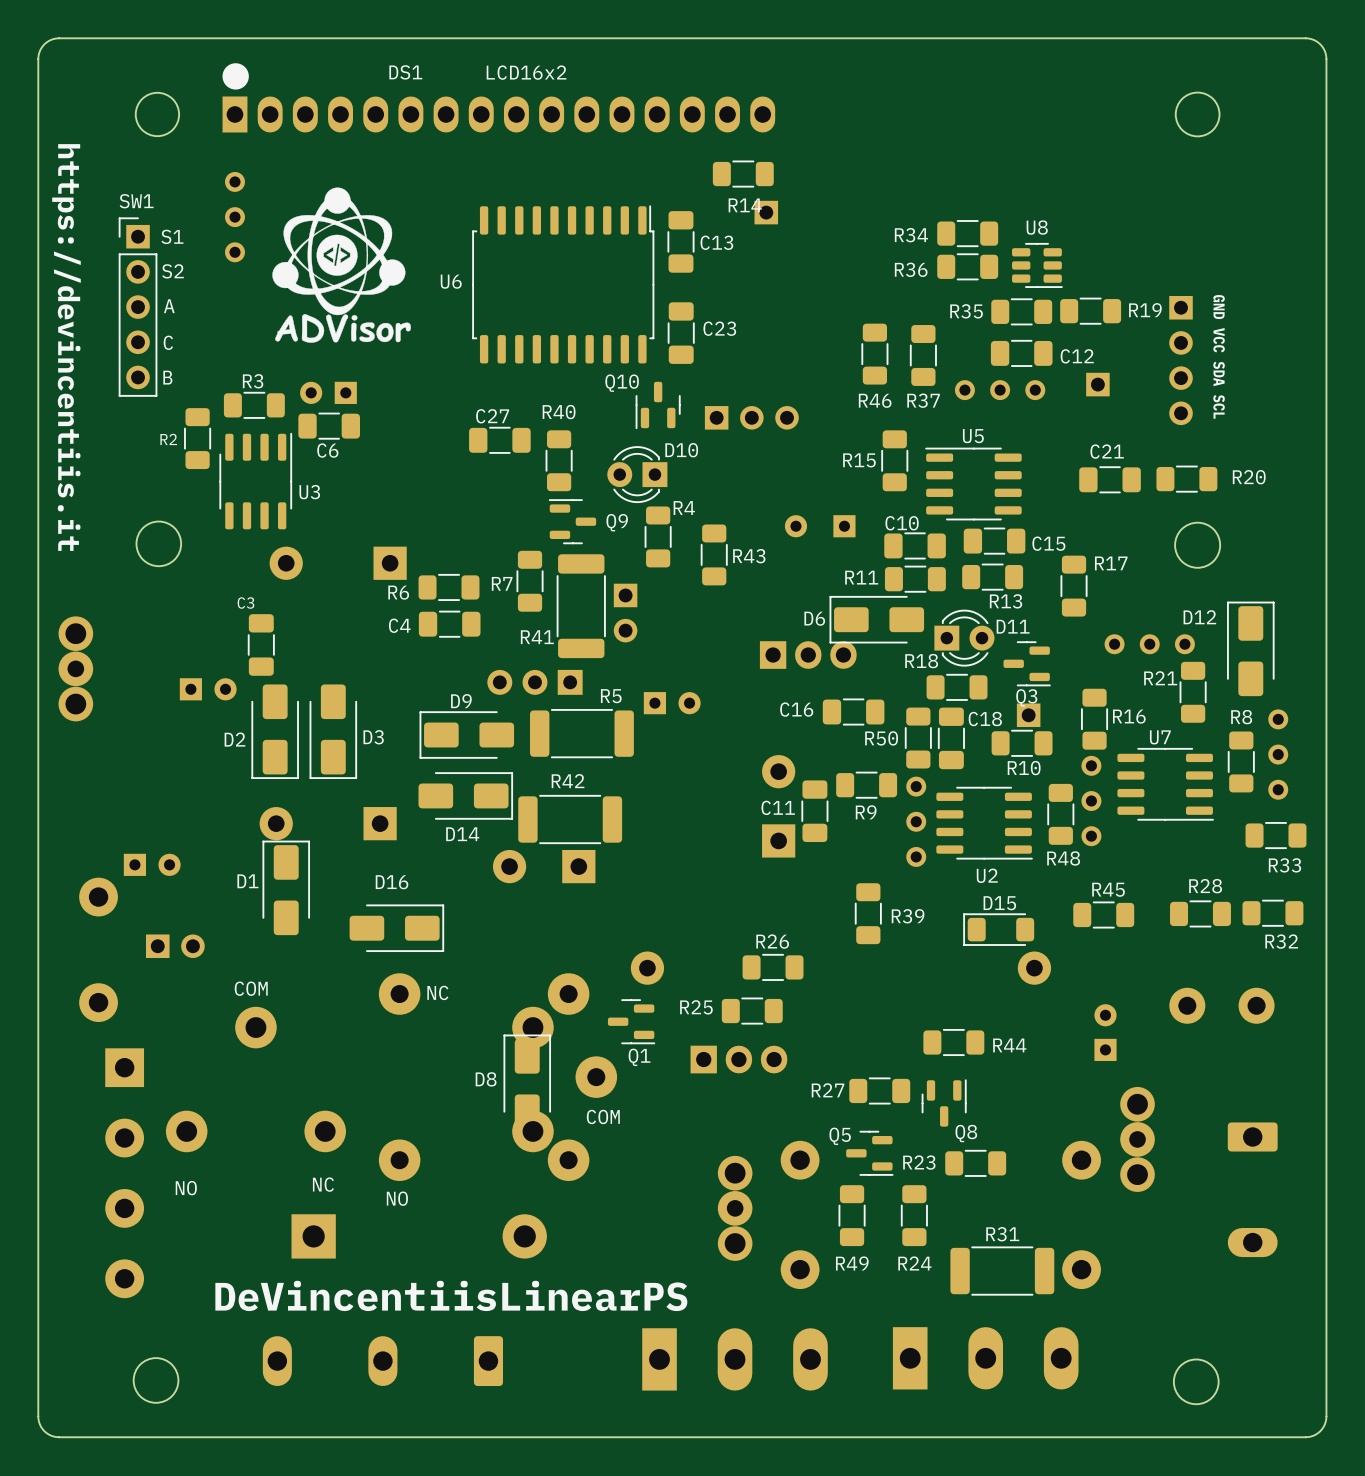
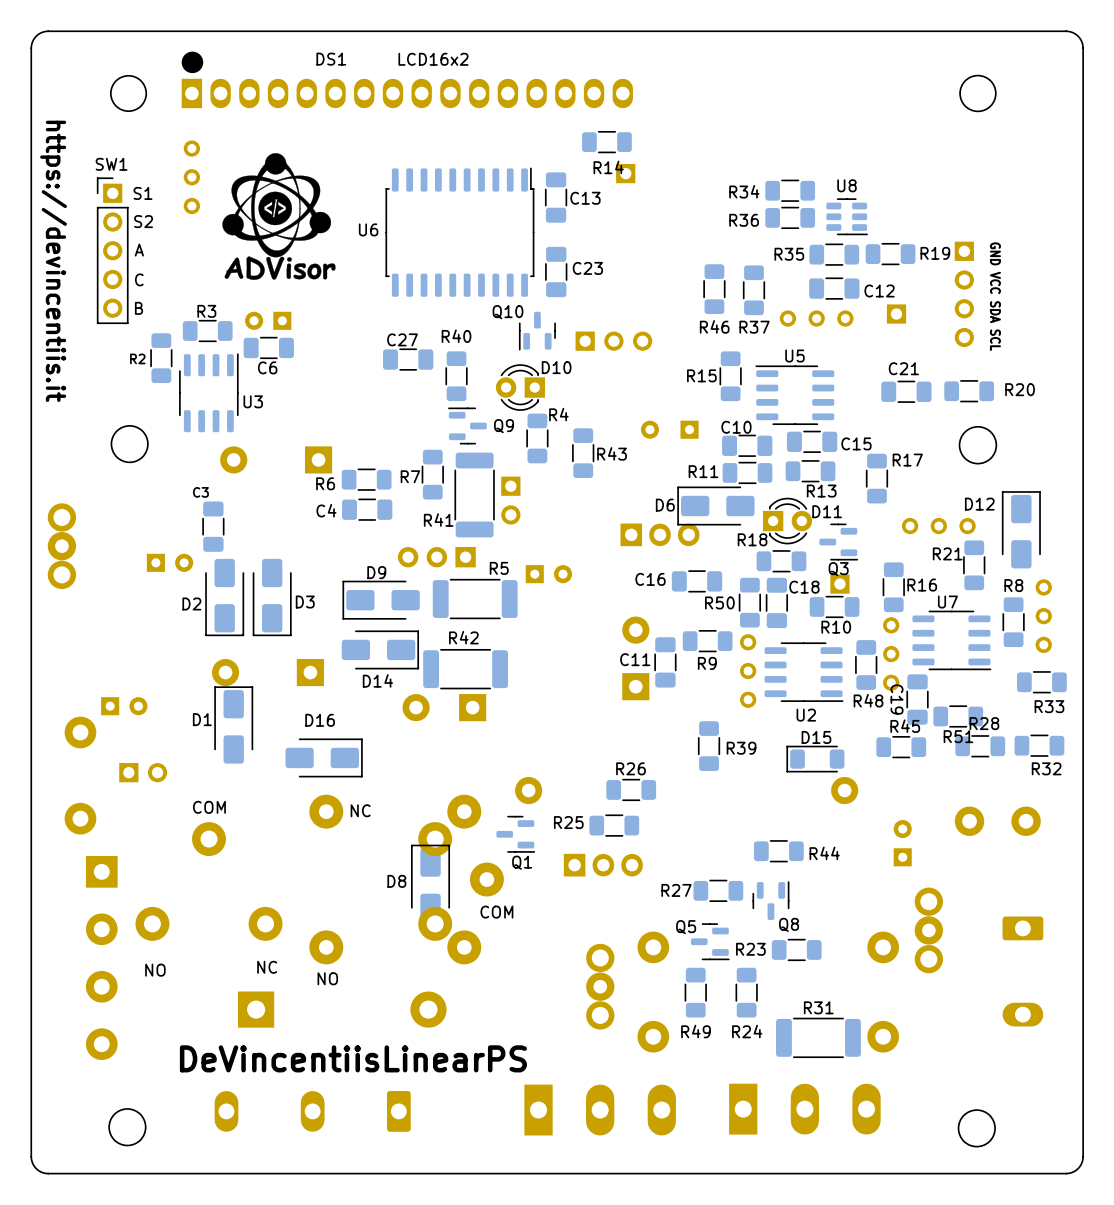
C19: none -> (917, 699)
R51: none -> (958, 716)

